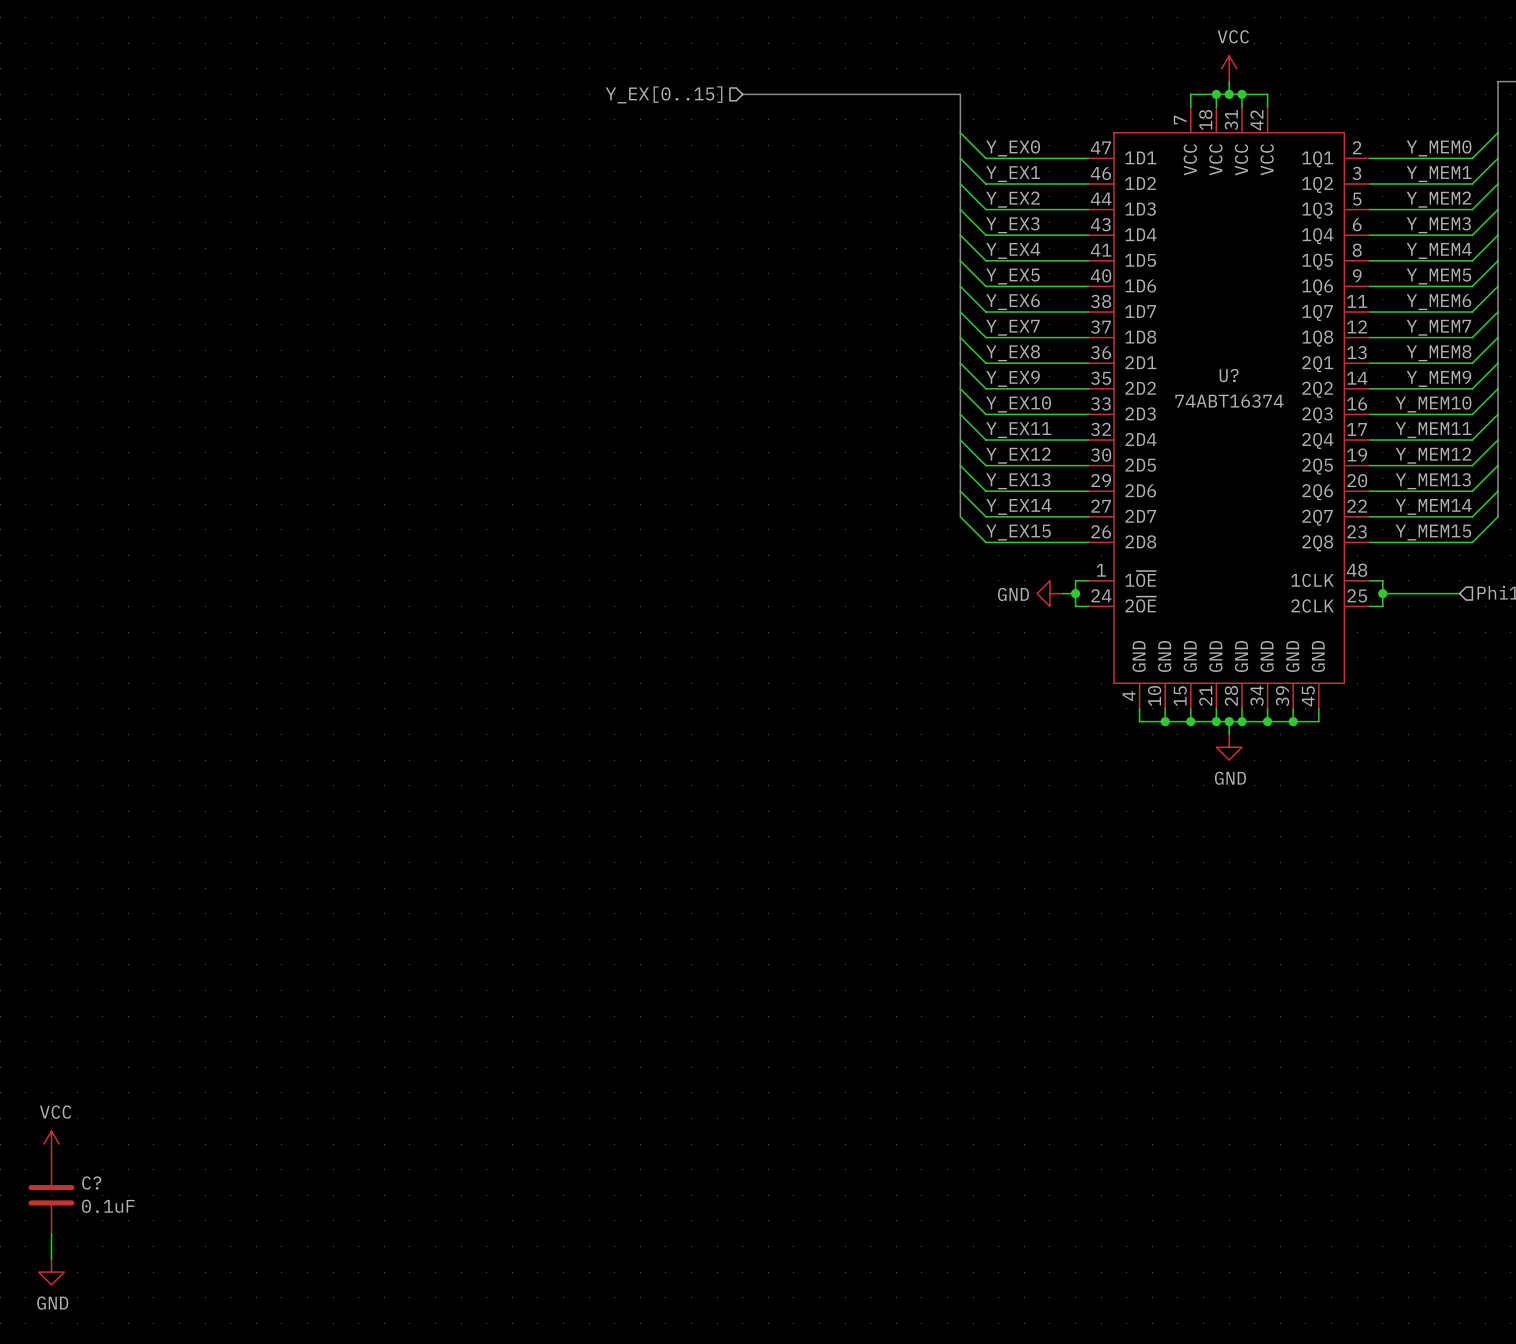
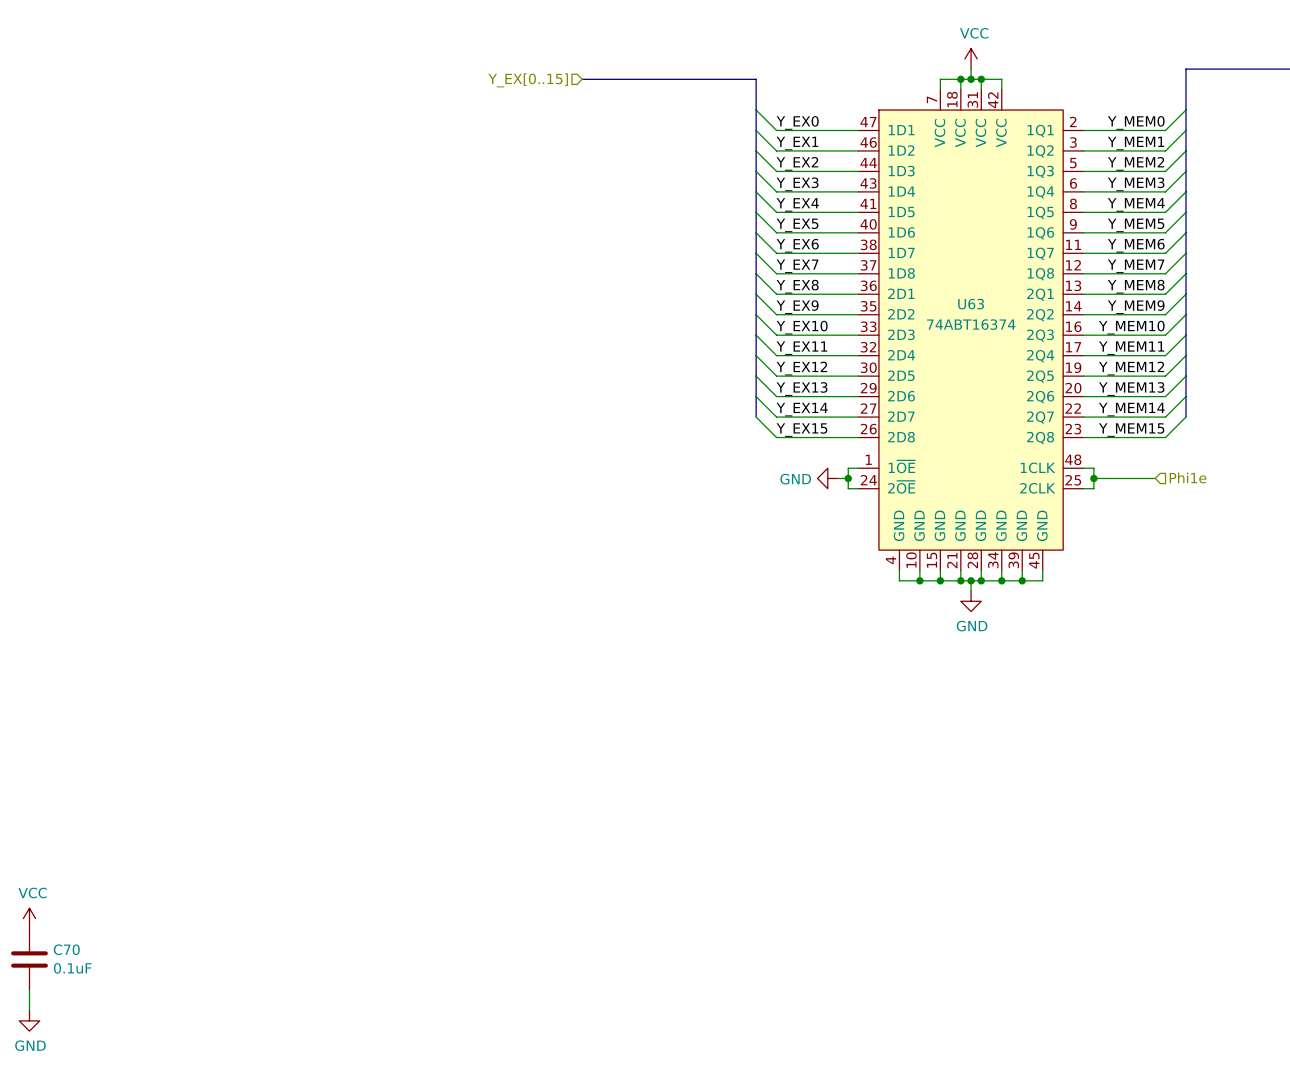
U? name: U? (1229, 375) -> U63 (971, 304)
C? name: C? (91, 1183) -> C70 (66, 949)

